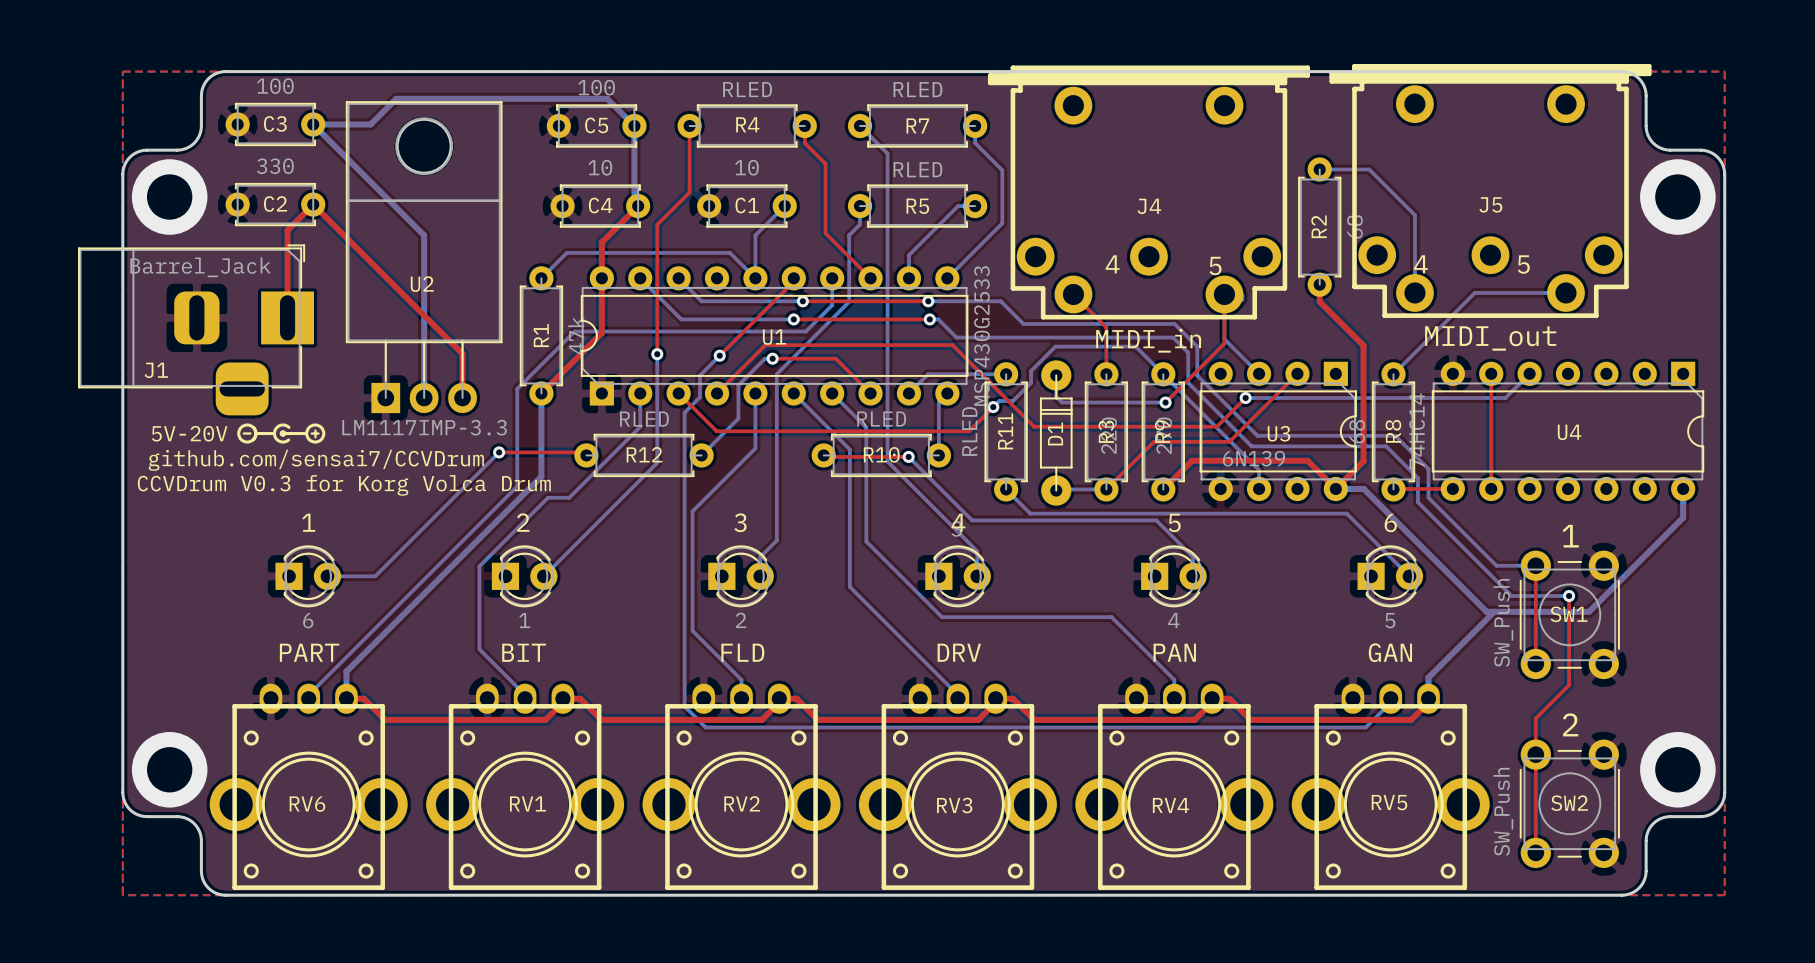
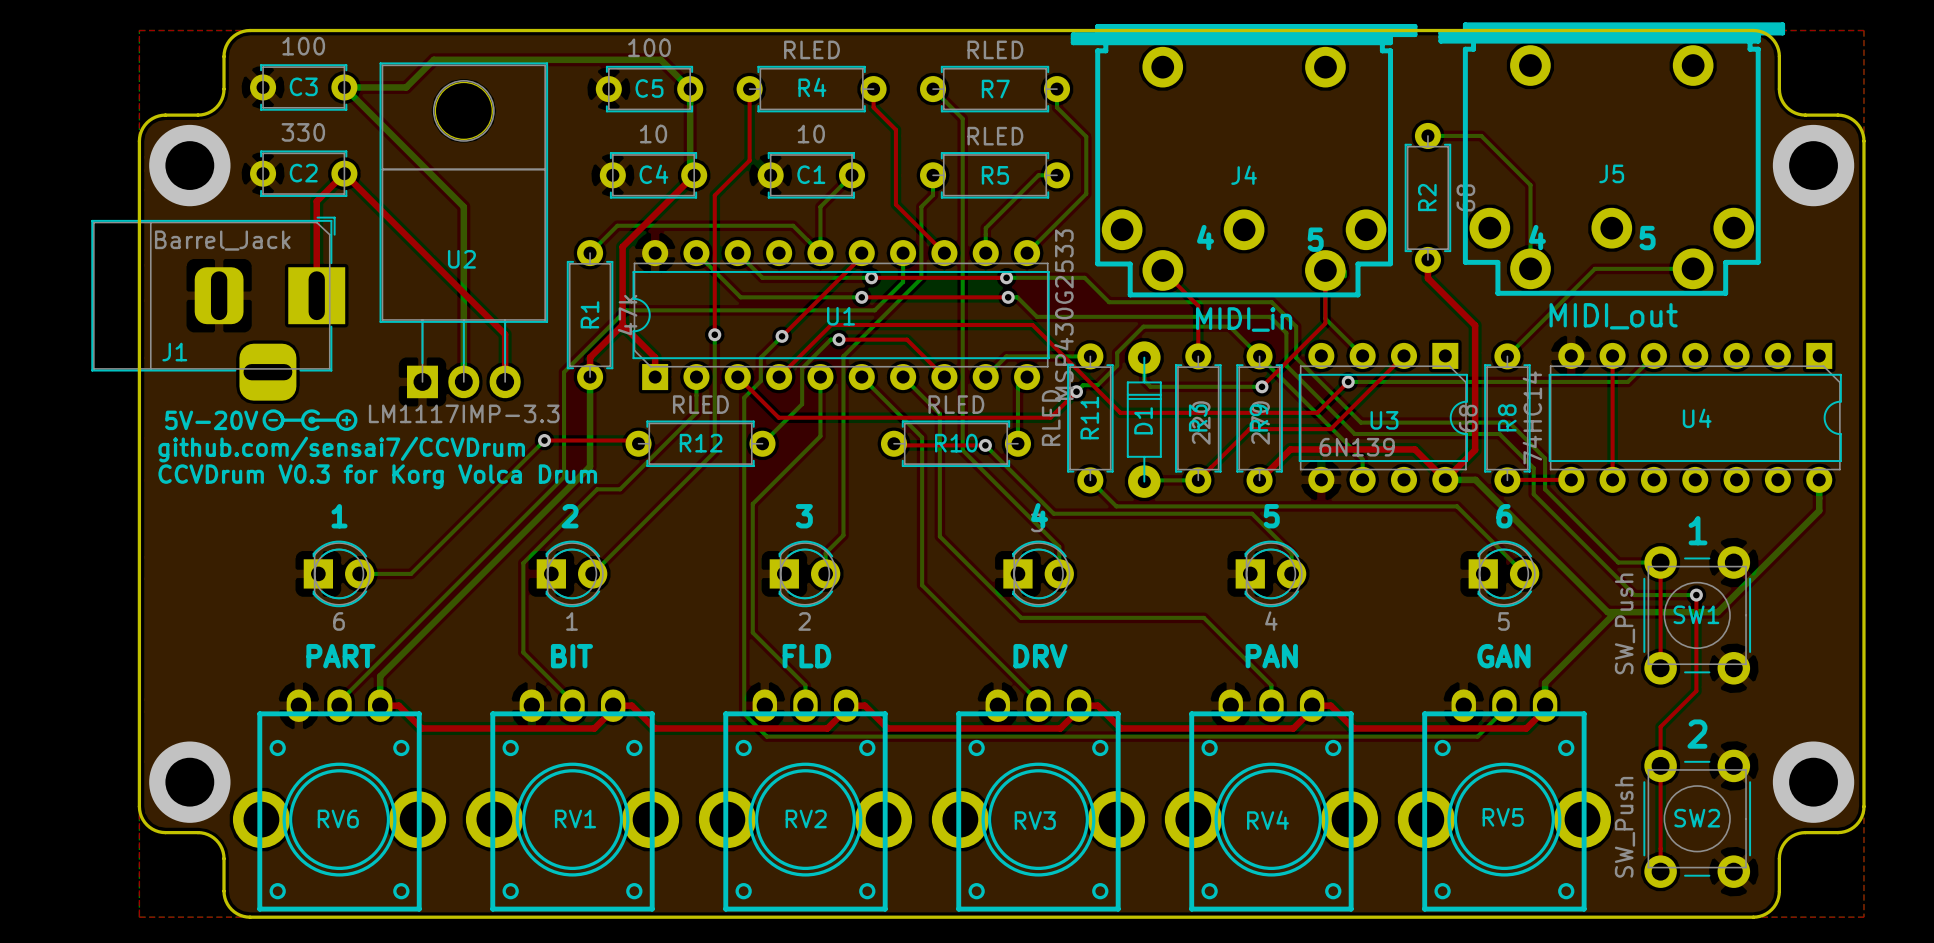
top track: (601, 242) (601, 333) (541, 393) -> (655, 214) (622, 246) (622, 324)
top track: none -> (622, 324) (655, 357) (655, 377)
top track: none -> (622, 324) (590, 357) (590, 377)

